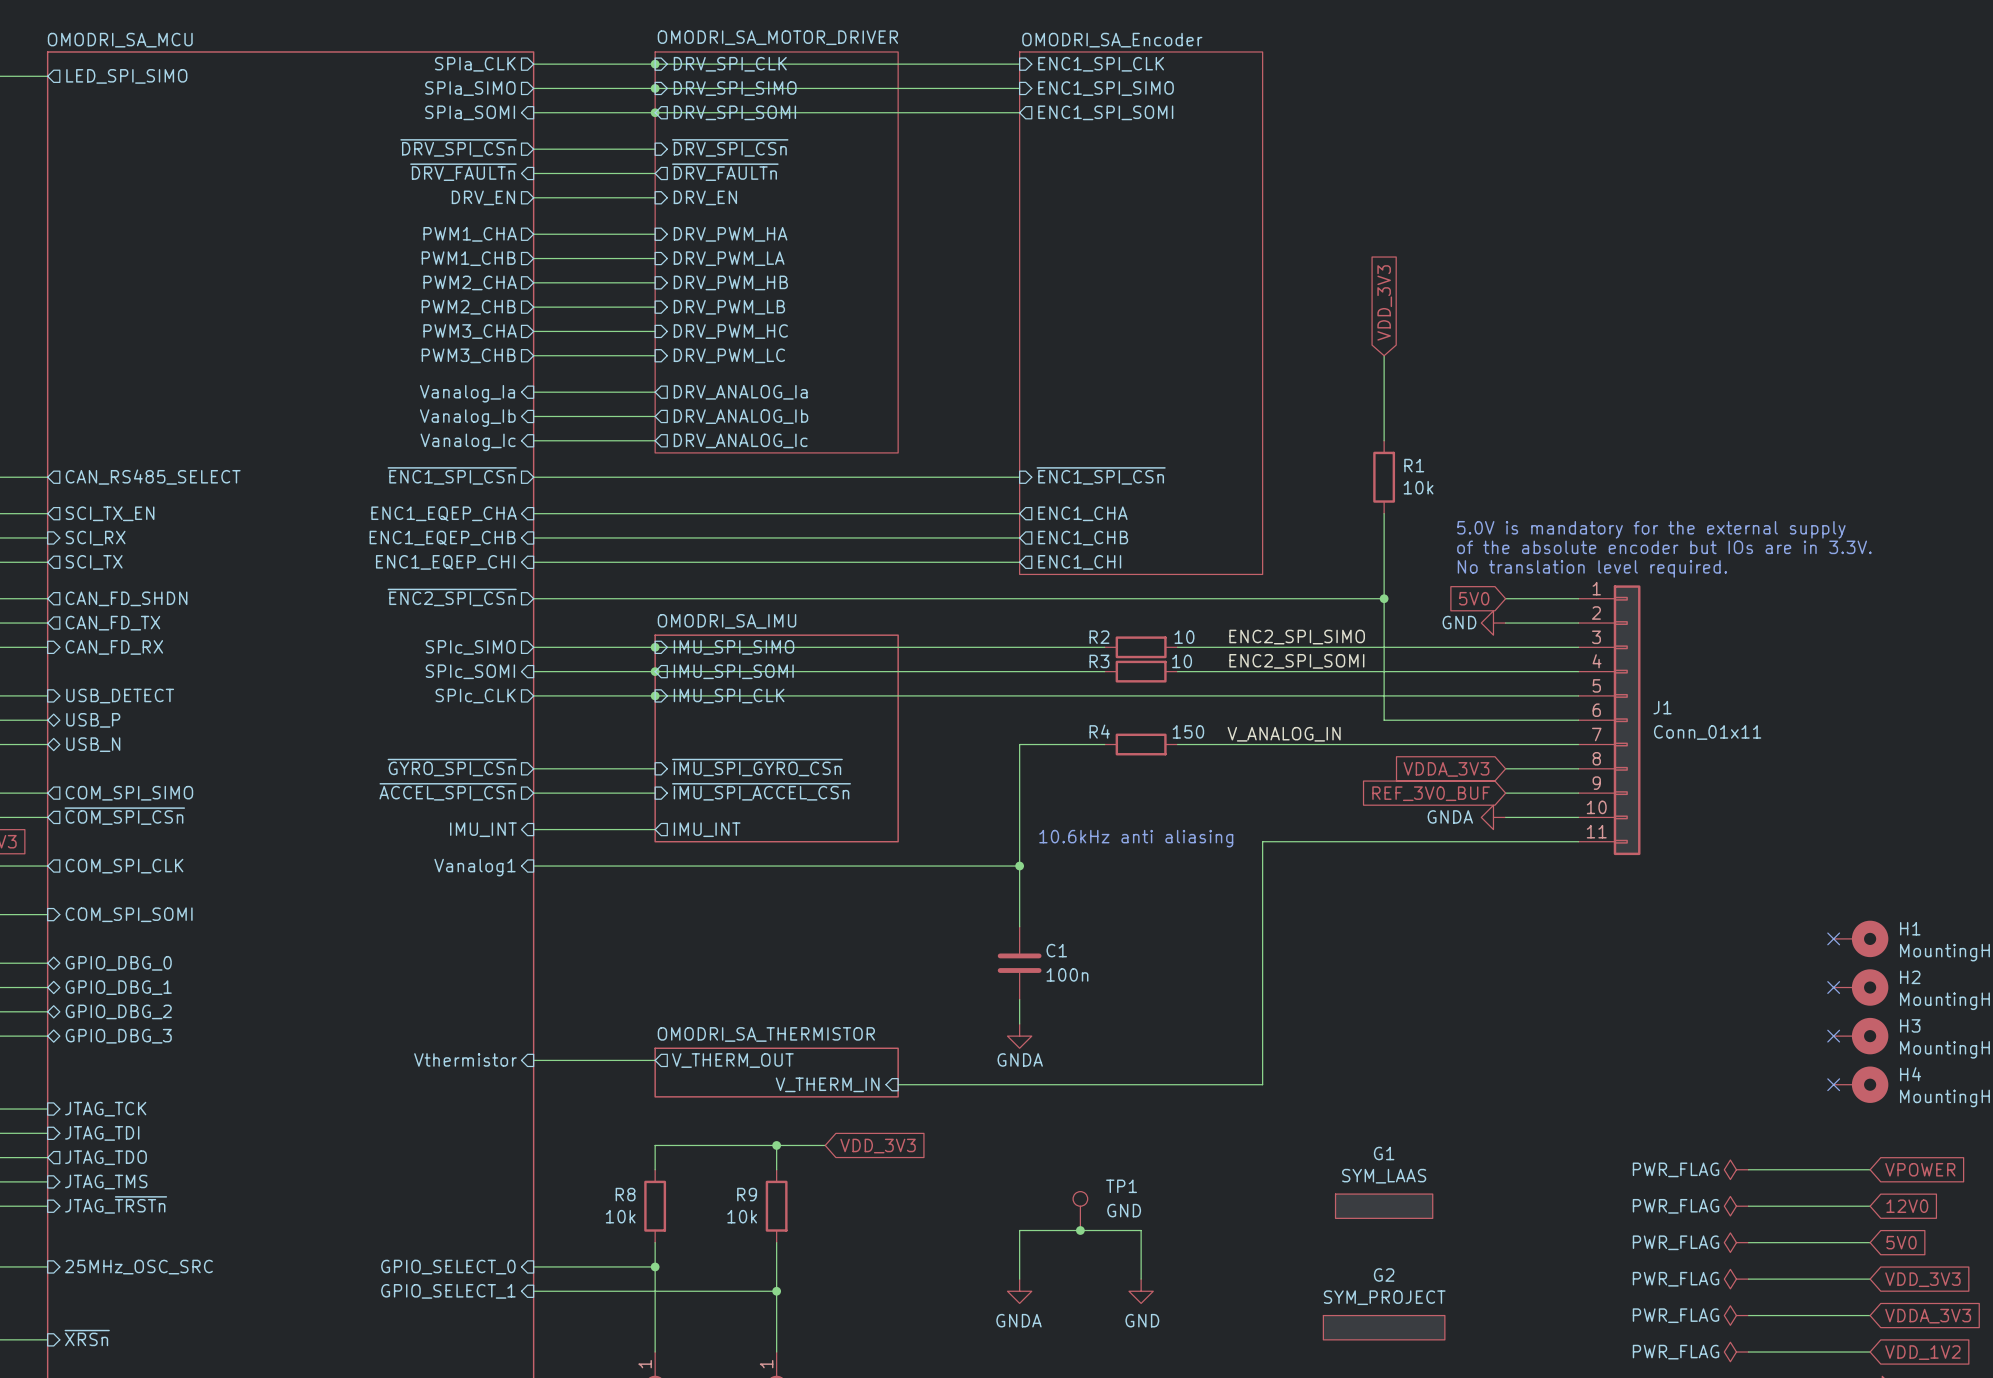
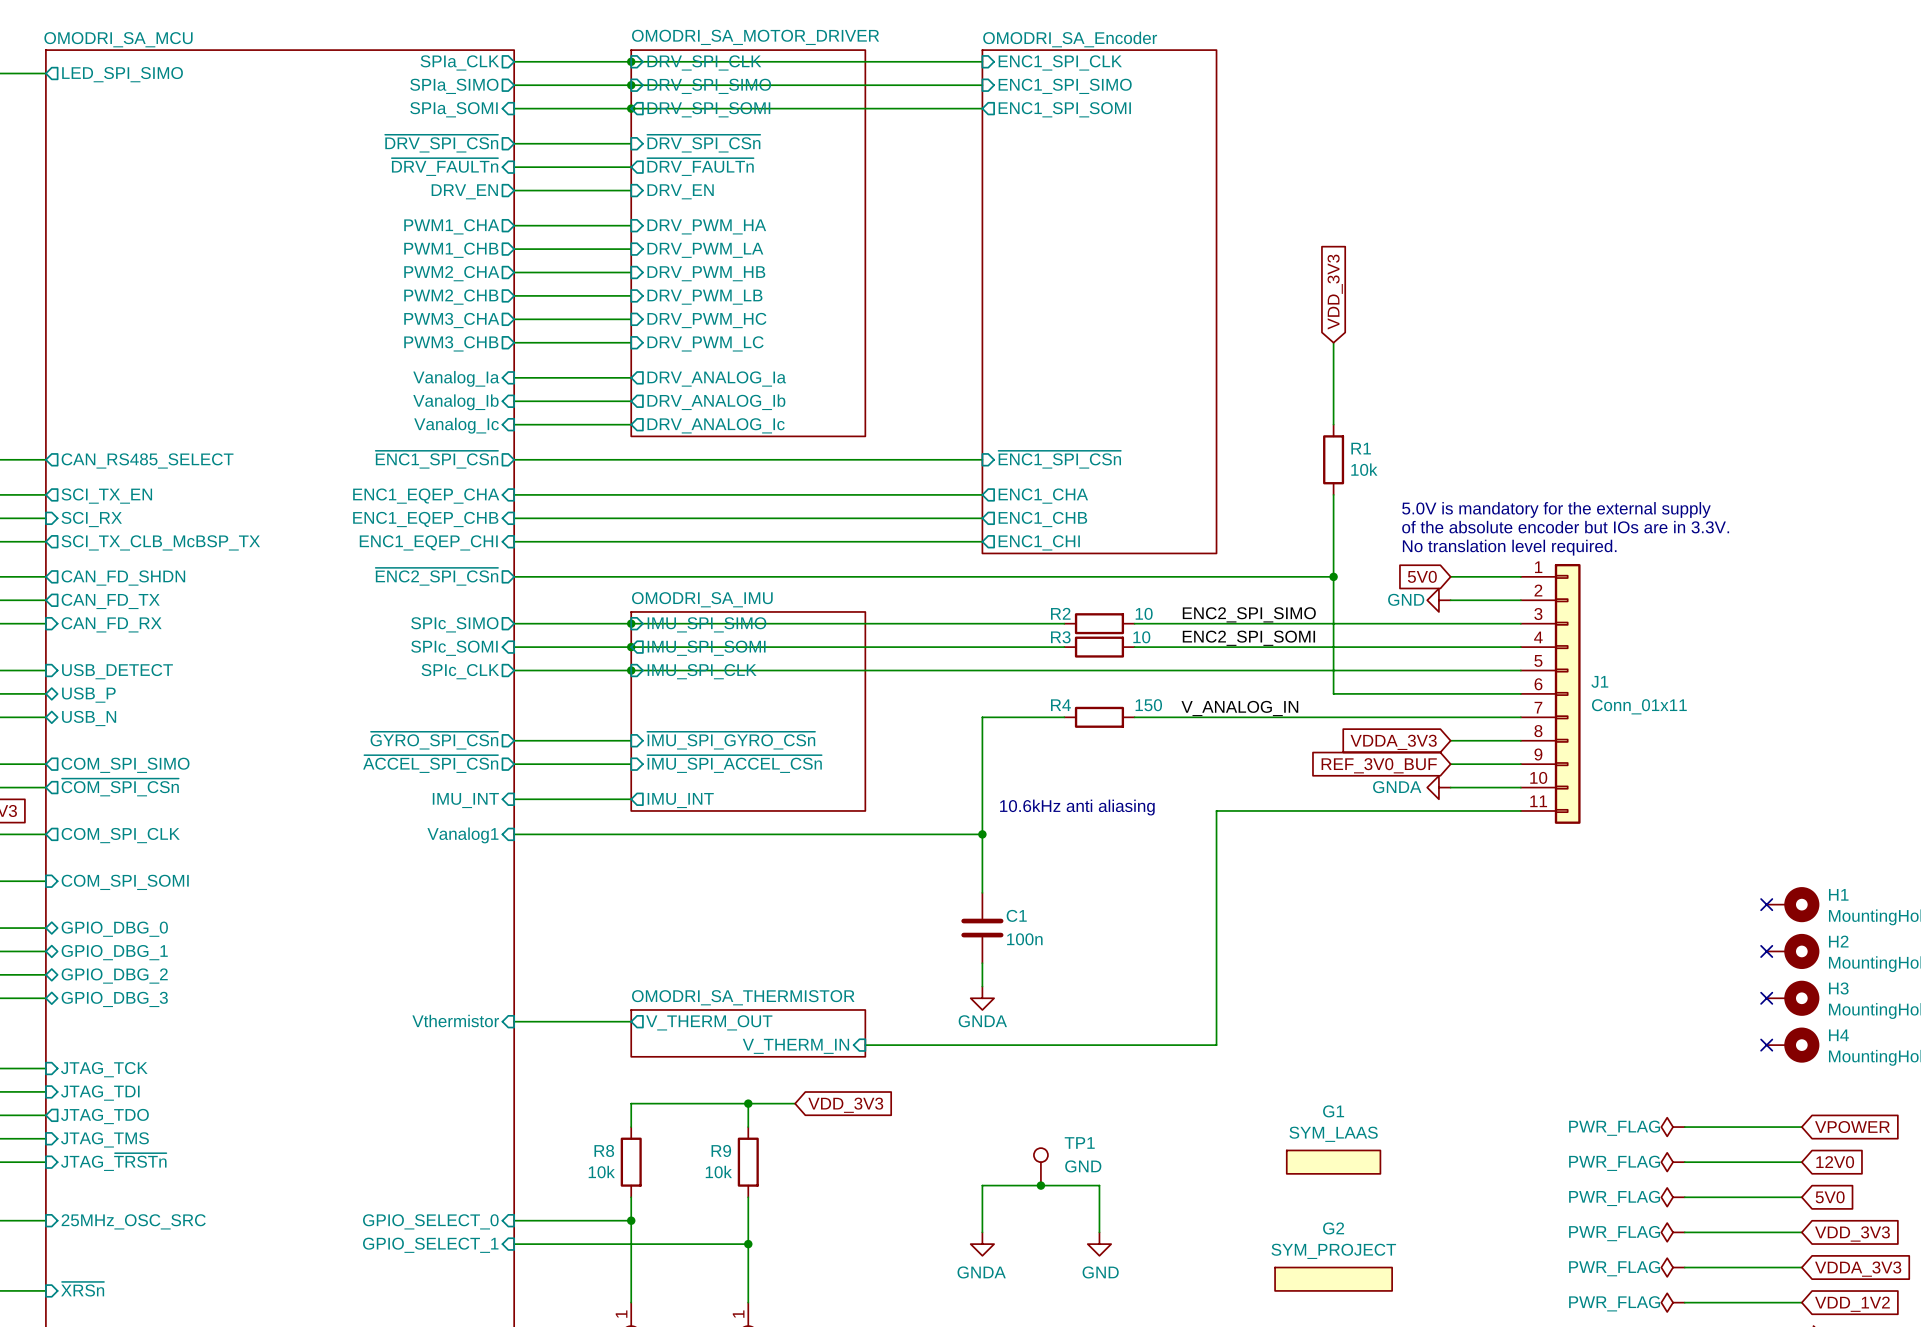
sheet pin: SCI_TX (94, 562) -> SCI_TX_CLB_McBSP_TX (160, 542)

